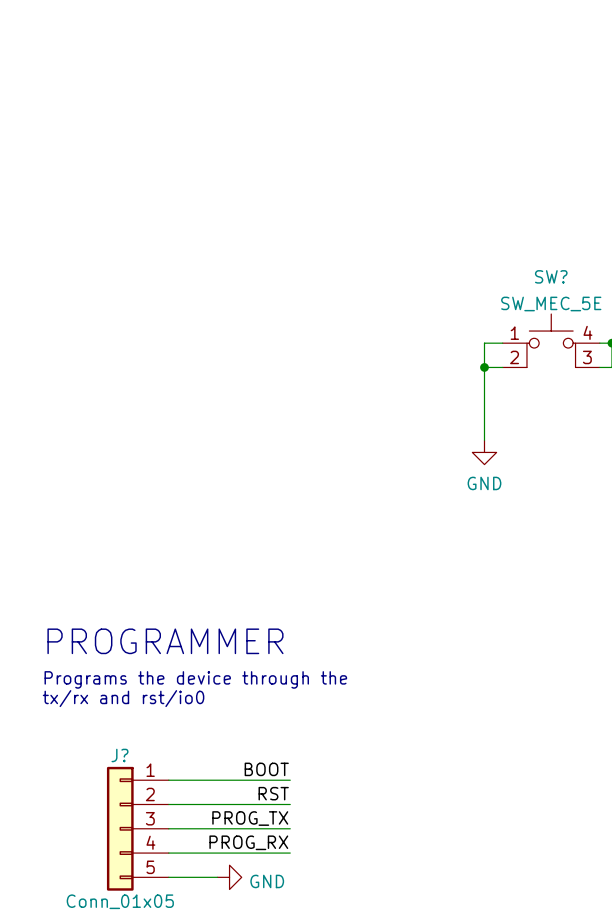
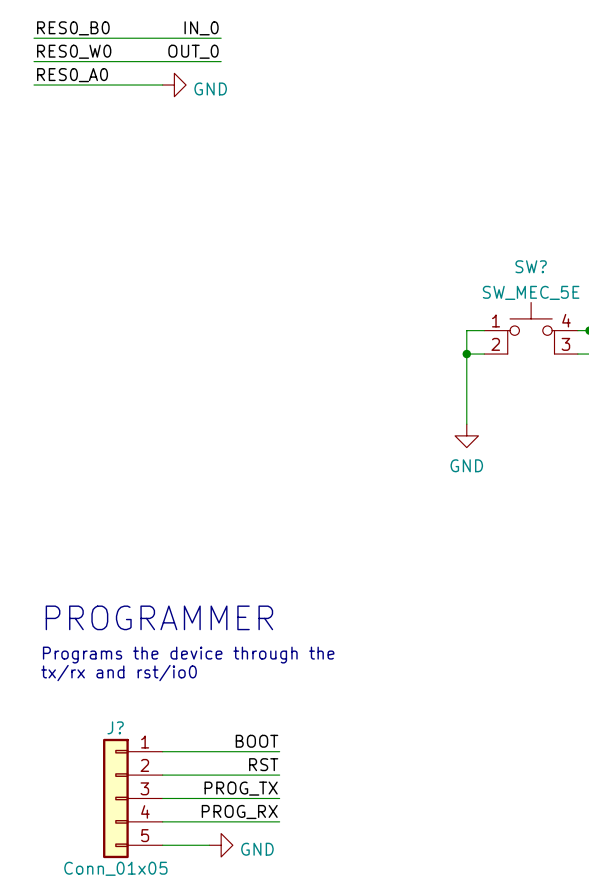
label: none -> RES0_B0 (73, 28)
label: none -> IN_0 (201, 28)
wire: none -> (34, 38) (221, 38)
label: none -> RES0_W0 (74, 51)
label: none -> OUT_0 (193, 51)
wire: none -> (34, 61) (221, 61)
label: none -> RES0_A0 (72, 75)
wire: none -> (34, 85) (162, 85)
power symbol: none -> GND (174, 85)

